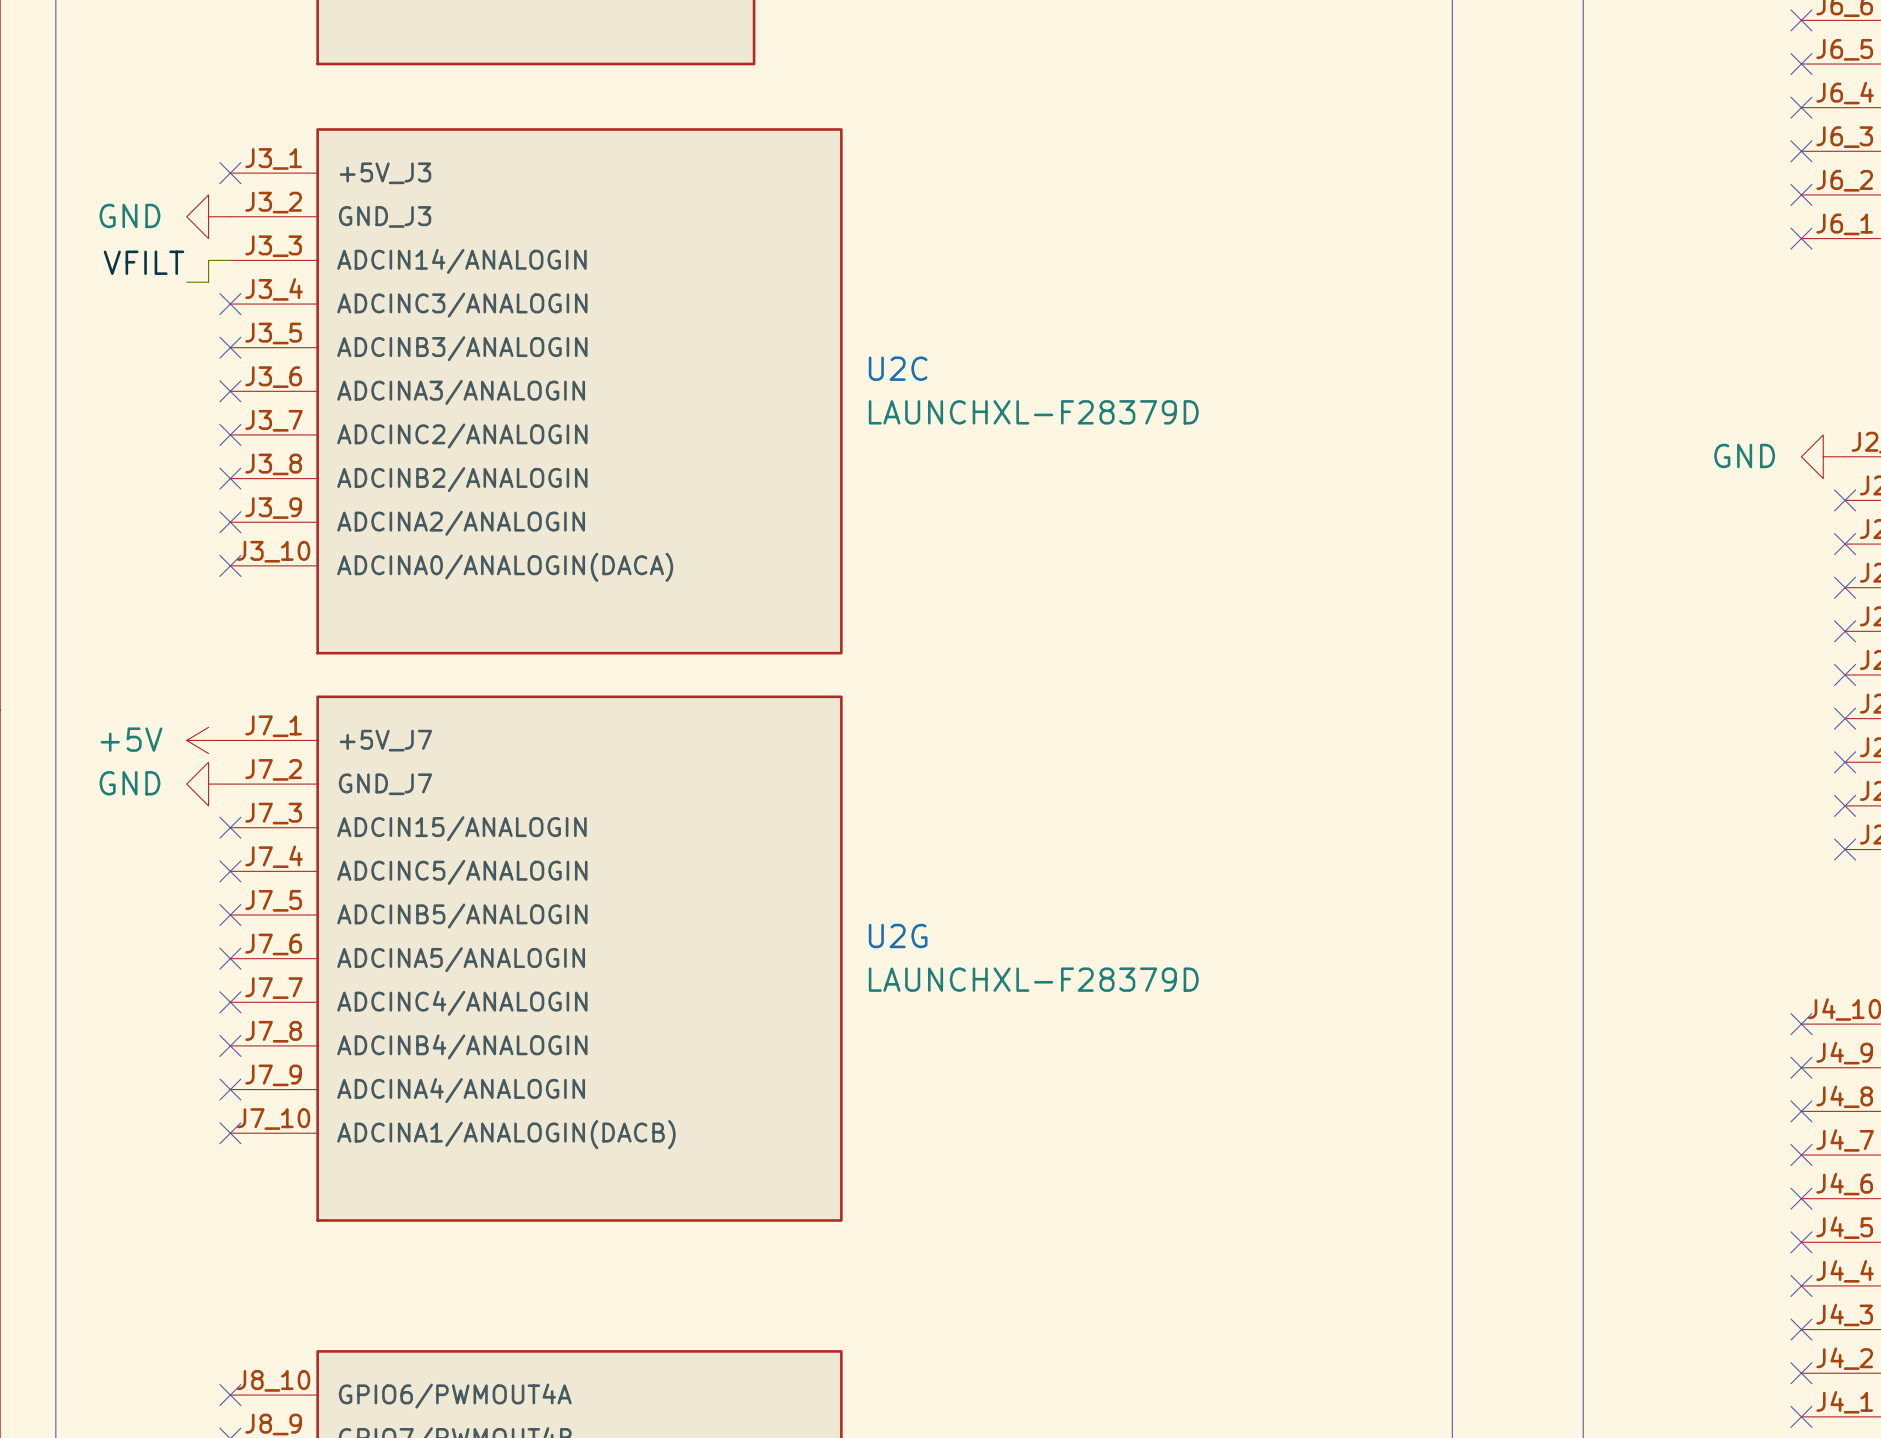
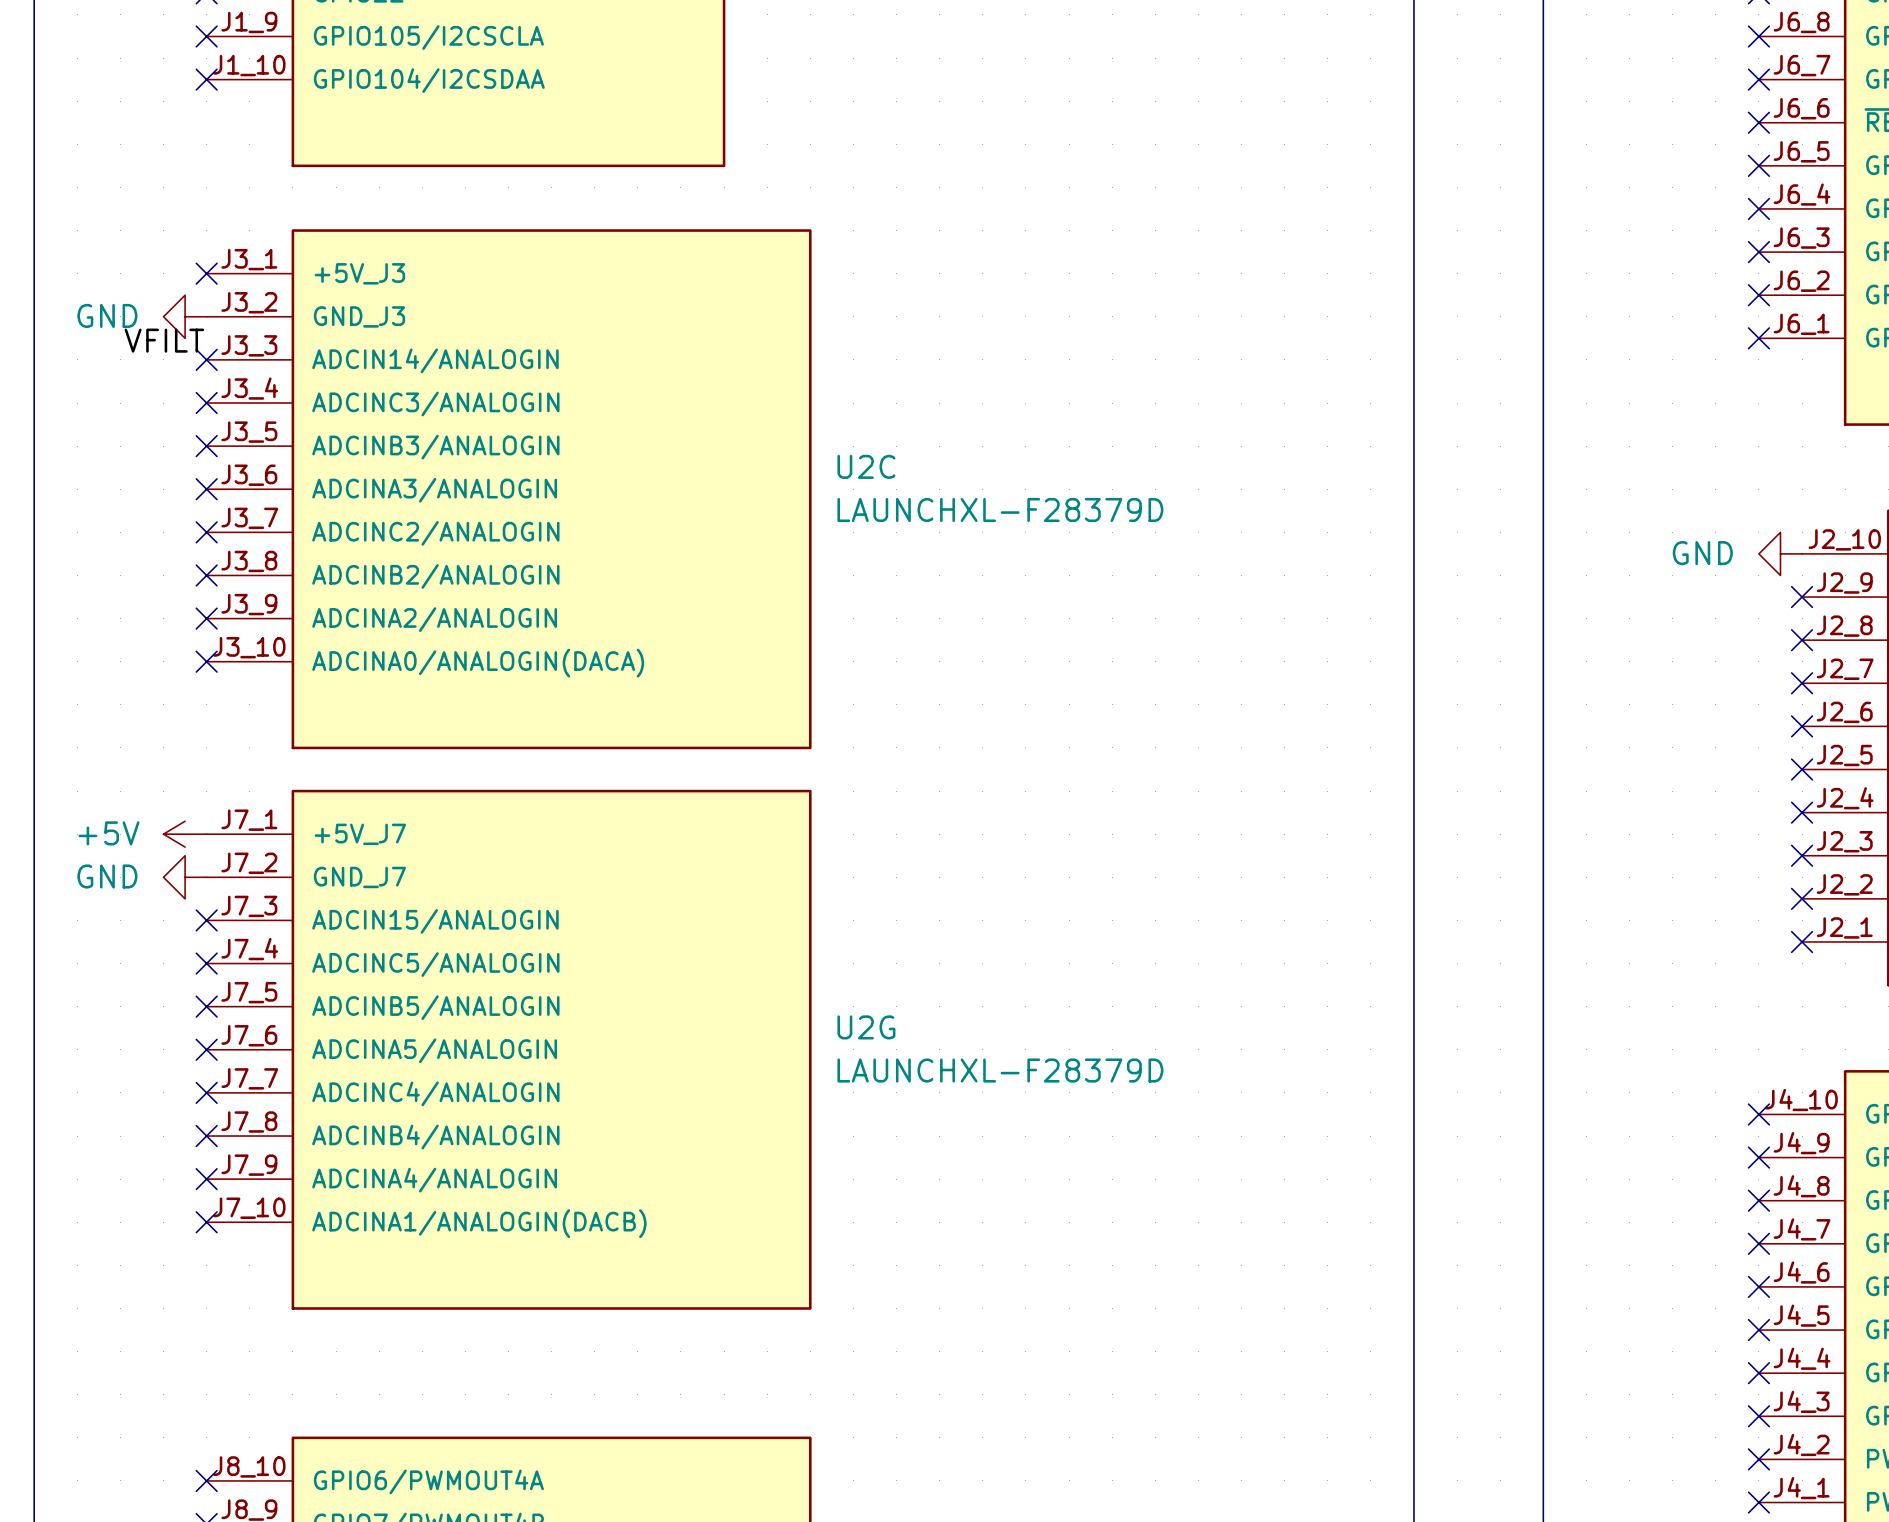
wire: (230, 260) (208, 260) (208, 282) (186, 282) -> none
no-connect mark: none -> (206, 359)
label position: VFILT (143, 262) -> VFILT (164, 340)

